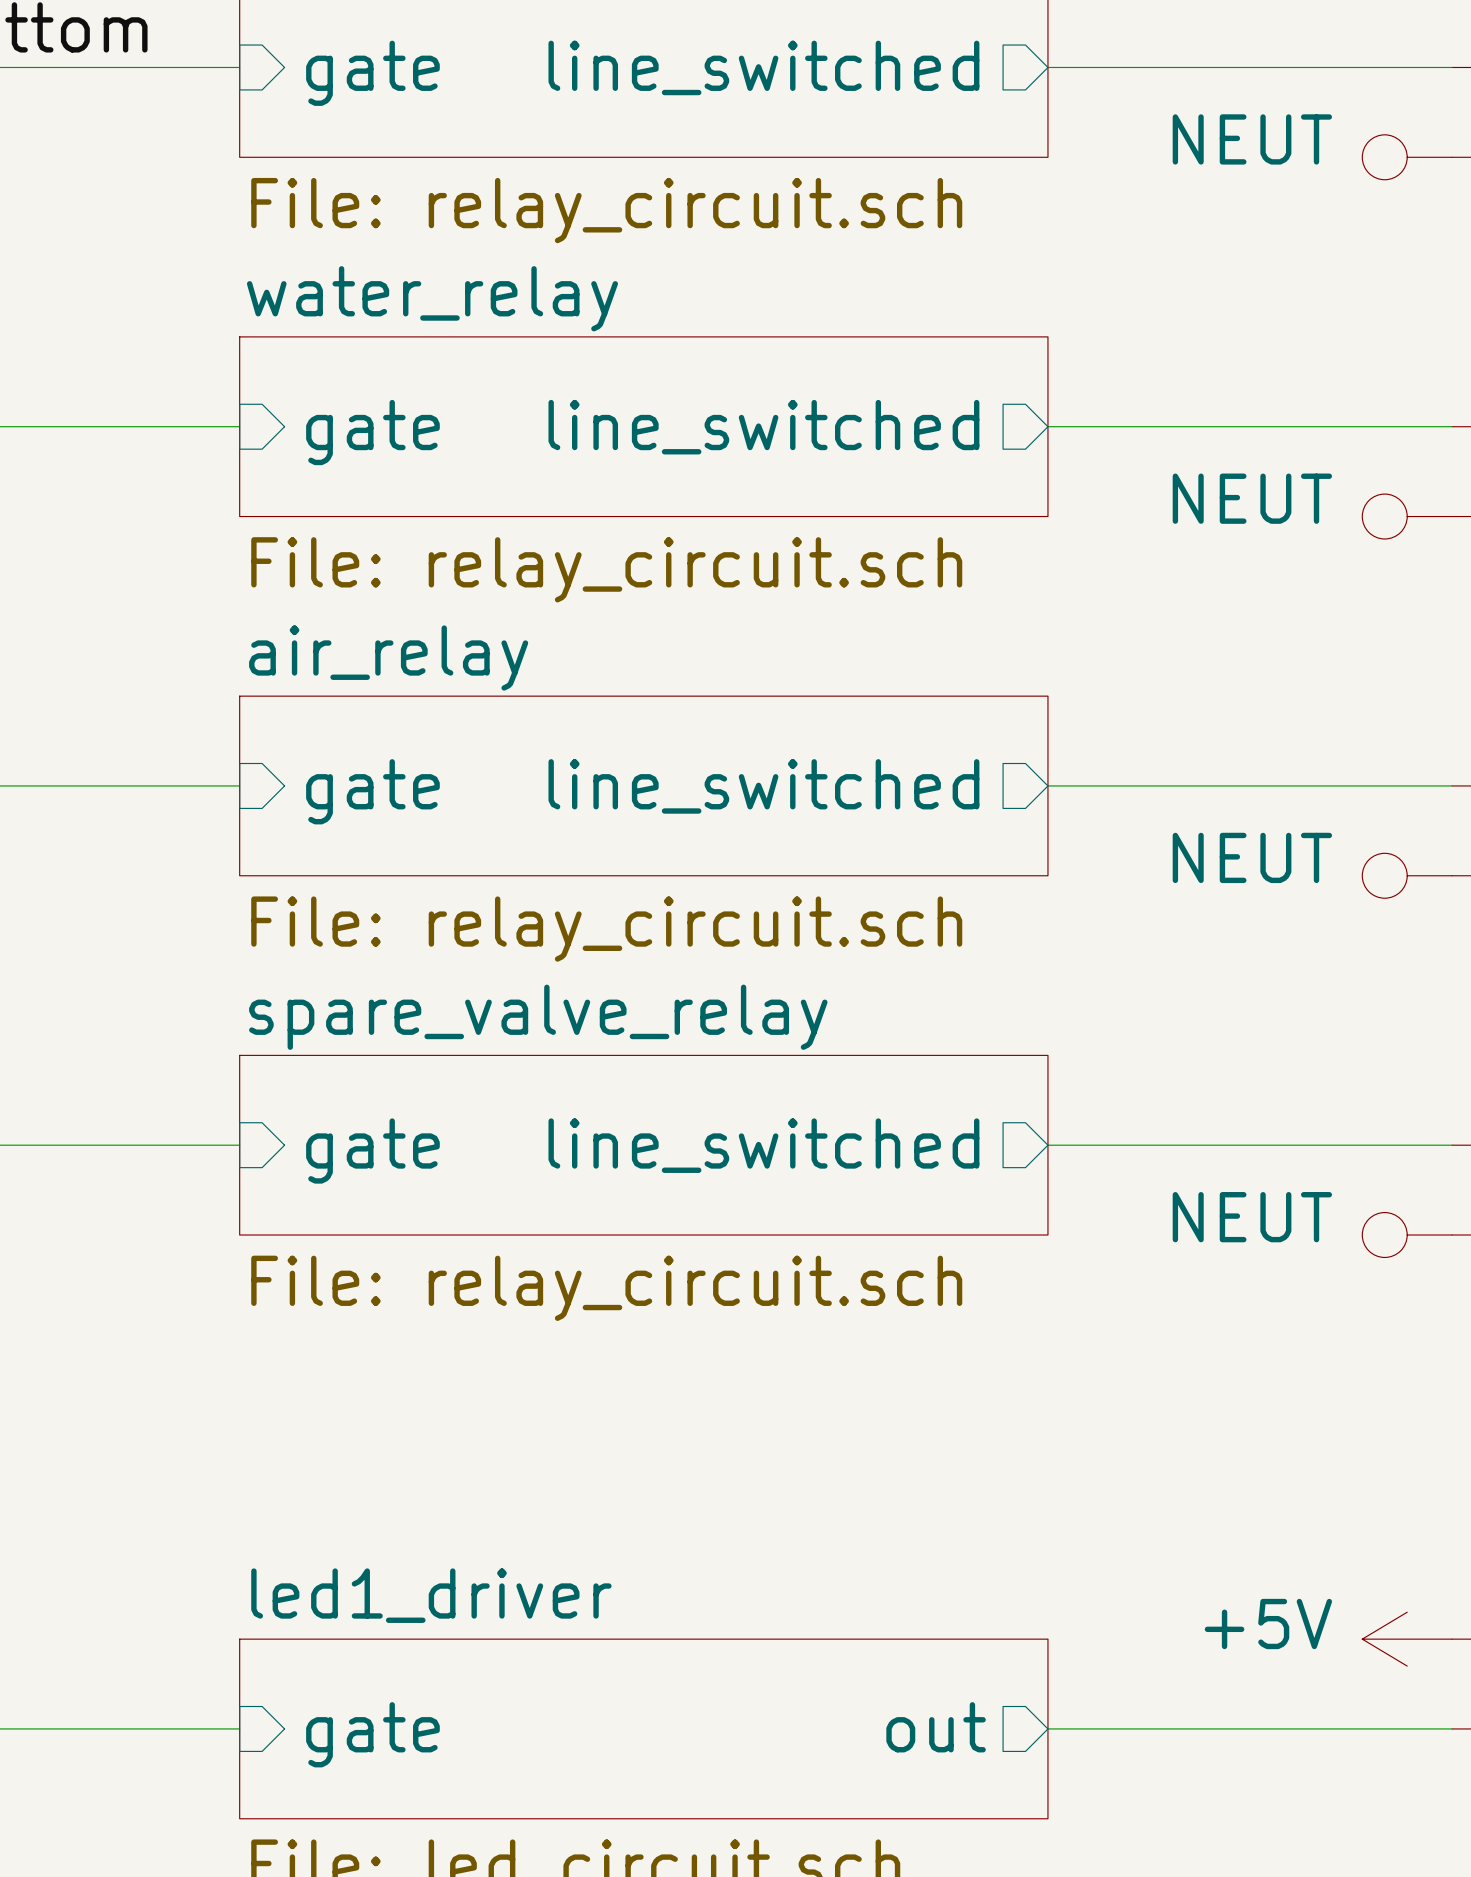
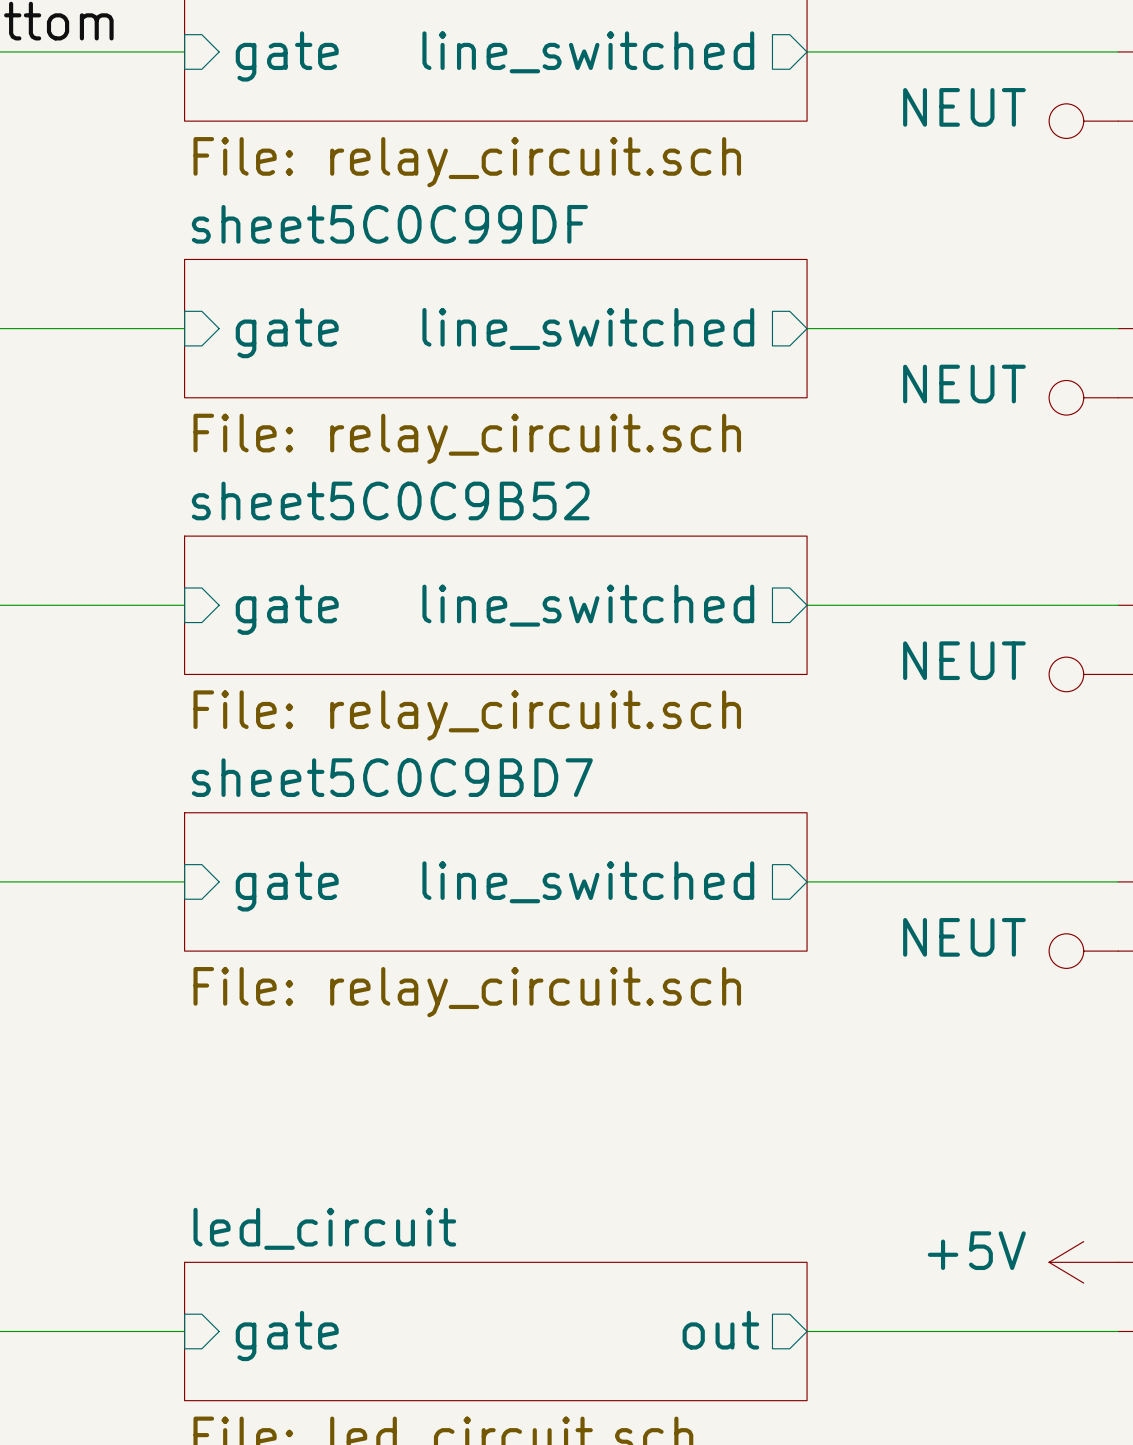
sheet water_relay name: water_relay (432, 298) -> sheet5C0C99DF (389, 224)
sheet air_relay name: air_relay (388, 658) -> sheet5C0C9B52 (390, 500)
sheet spare_valve_relay name: spare_valve_relay (538, 1017) -> sheet5C0C9BD7 (392, 777)
sheet led1_driver name: led1_driver (431, 1595) -> led_circuit (324, 1228)

